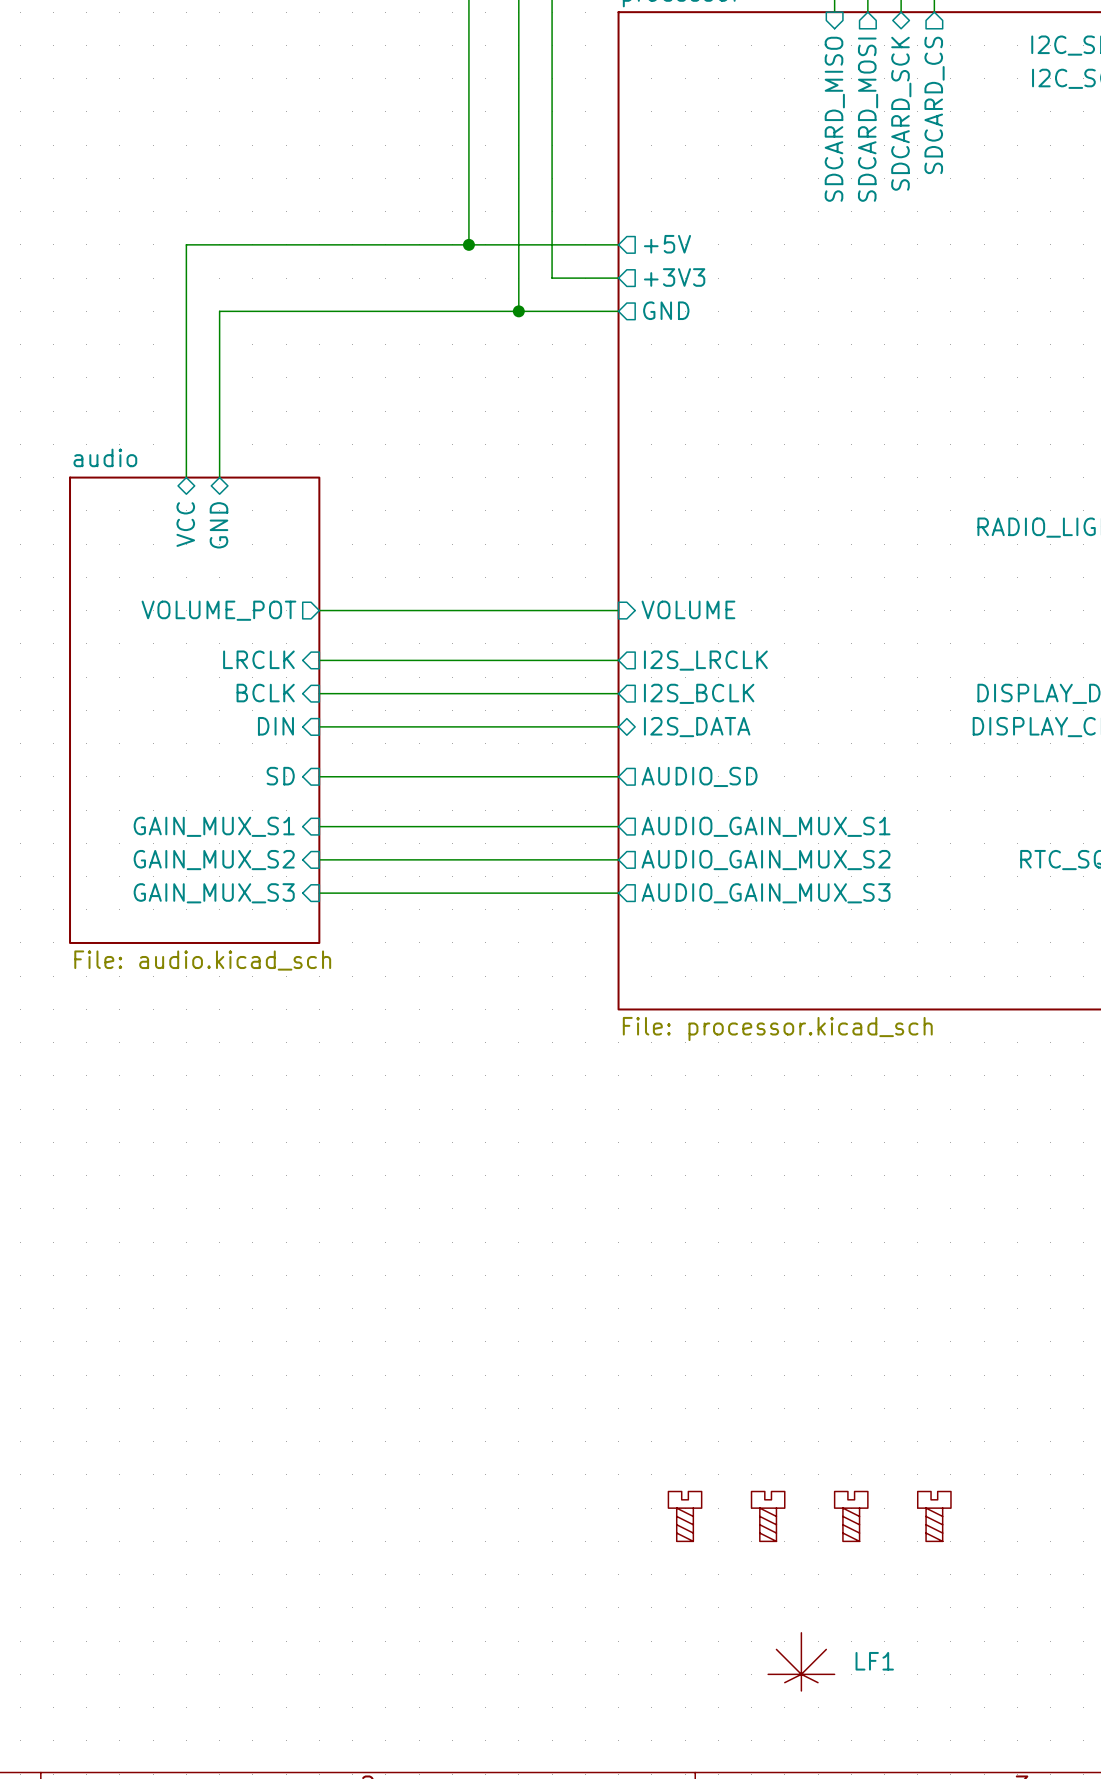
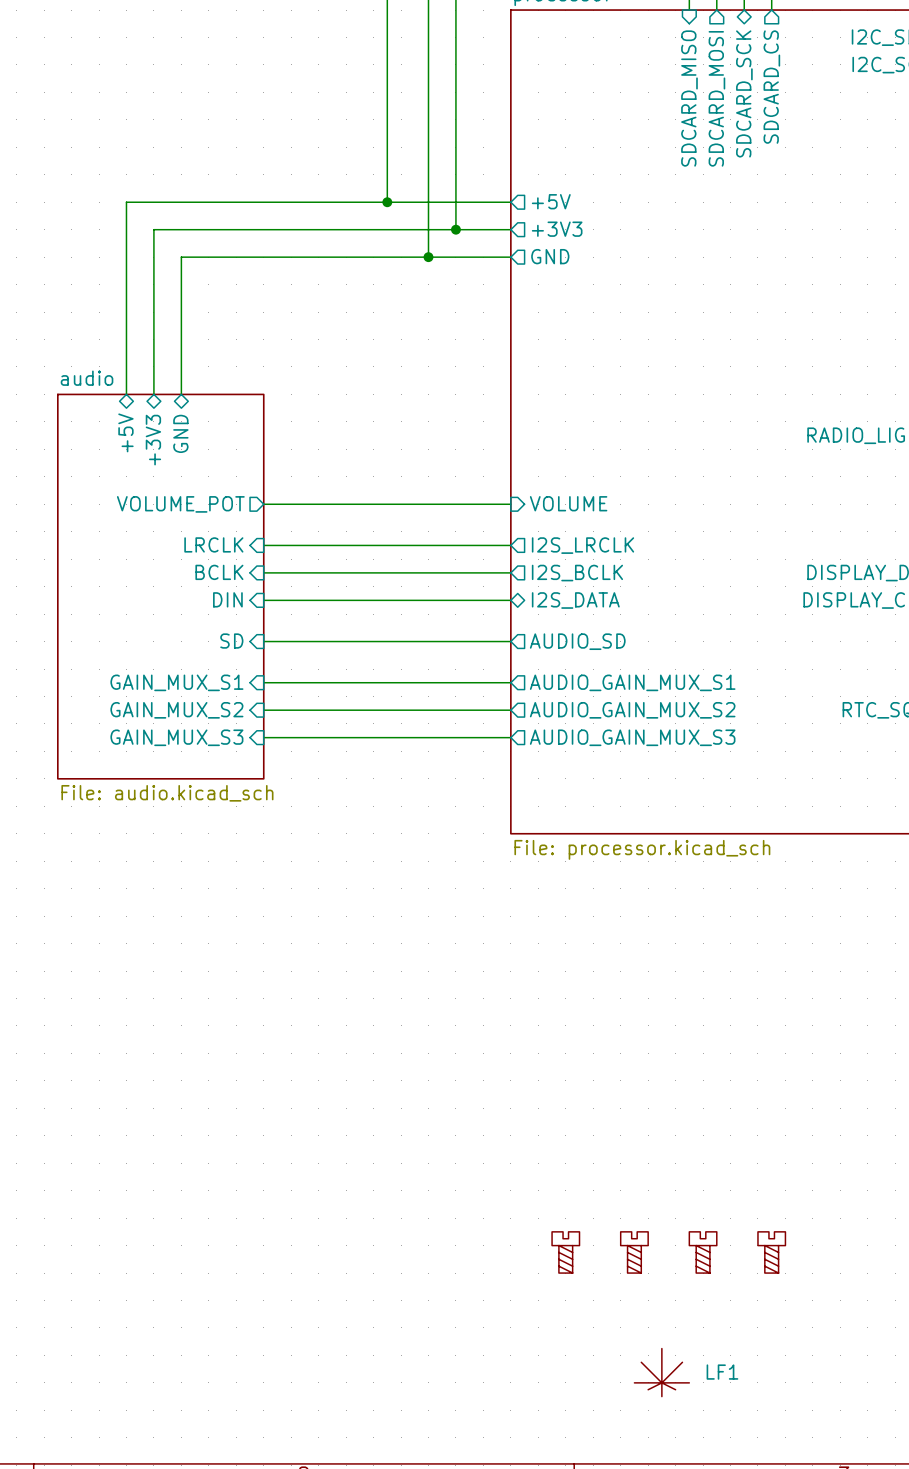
wire: (186, 244) (186, 278) -> (153, 202) (126, 202) (126, 394)
wire: none -> (153, 229) (455, 229)
junction: none -> (455, 229)
sheet pin: none -> +5V (125, 432)
sheet pin: VCC (185, 524) -> +3V3 (153, 440)

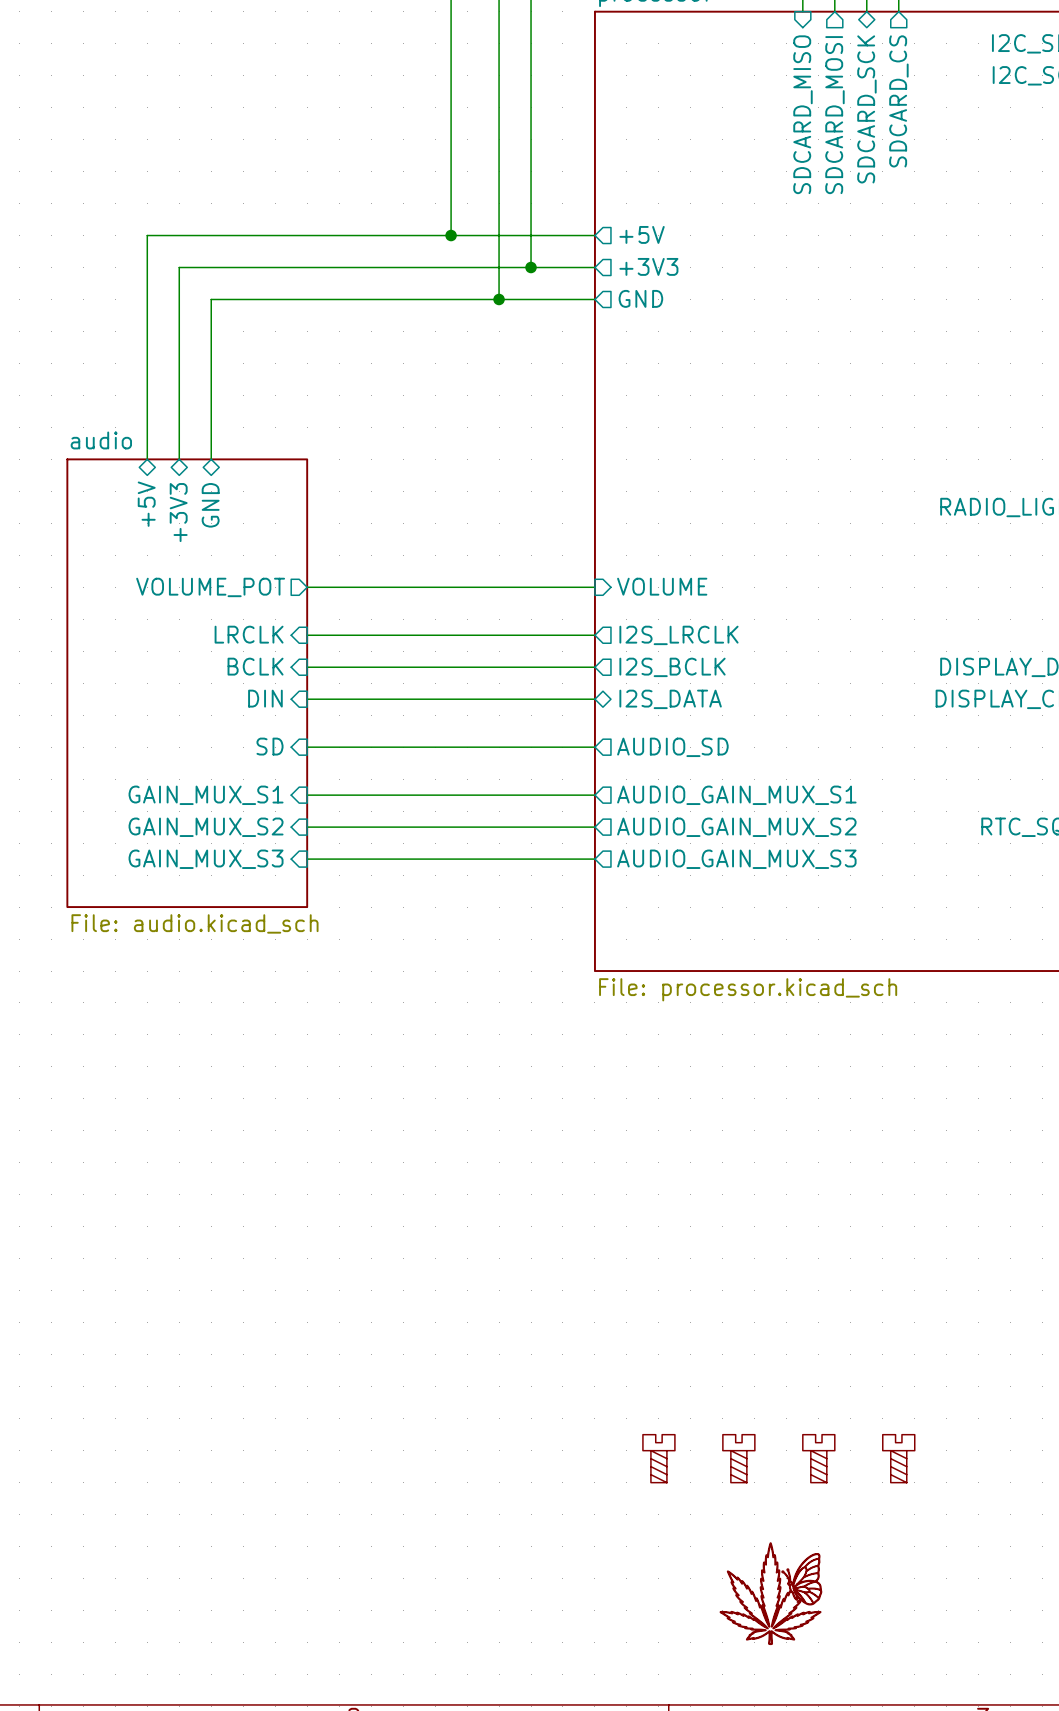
part: none -> (770, 1593)
LF1: (661, 1372) -> none

